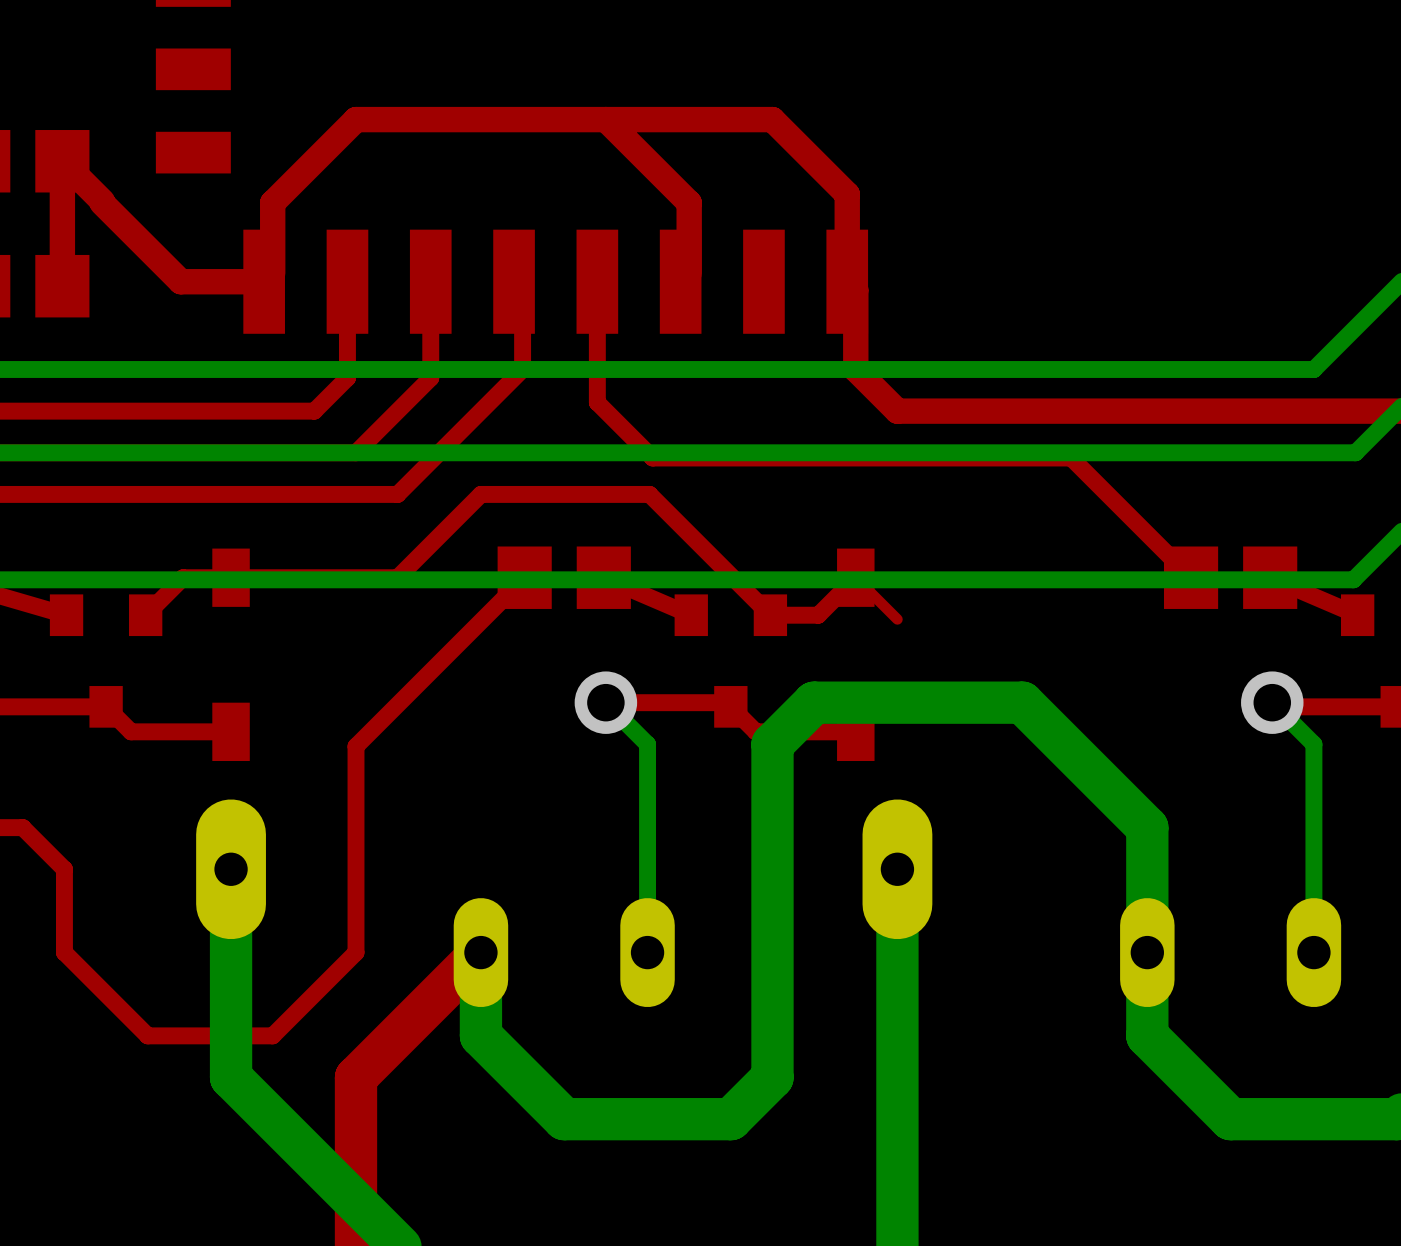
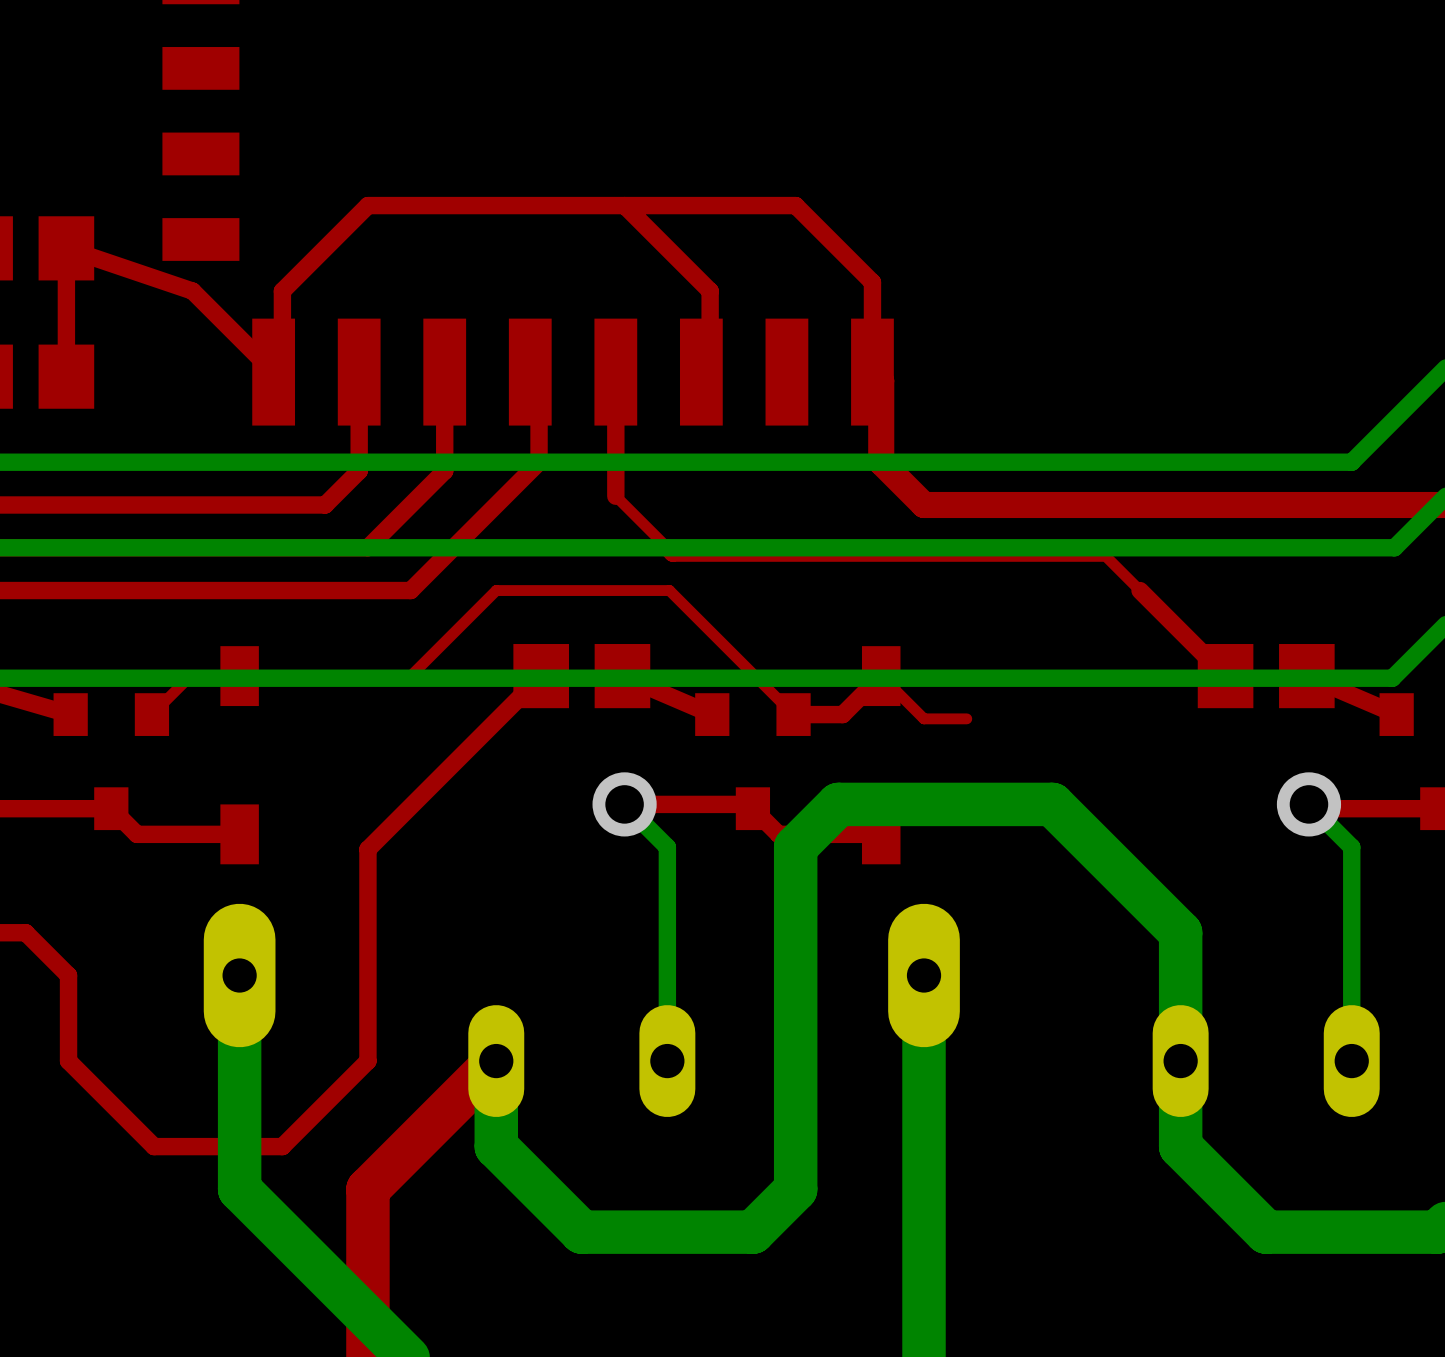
top track width: thick (605, 119) (689, 202) (689, 273) -> thin (624, 205) (710, 291) (710, 363)
top track: (62, 161) (180, 281) (264, 281) -> (66, 248) (192, 291) (273, 372)
top track width: thick (62, 161) (62, 286) -> thin (66, 248) (66, 376)
top track width: thick (272, 273) (272, 202) (356, 119) (772, 119) (847, 194) (847, 281) -> thin (282, 363) (282, 291) (367, 205) (795, 205) (872, 282) (872, 372)
top track width: thick (597, 402) (647, 452) -> thin (615, 496) (667, 547)
top track width: thick (1071, 457) (1107, 494) -> thin (1102, 553) (1140, 590)
top track width: thick (770, 615) (649, 494) (480, 494) (397, 577) (183, 577) (145, 615) -> thin (793, 714) (669, 590) (496, 590) (410, 676) (190, 676) (151, 714)
top track: none -> (966, 718) (924, 718)

